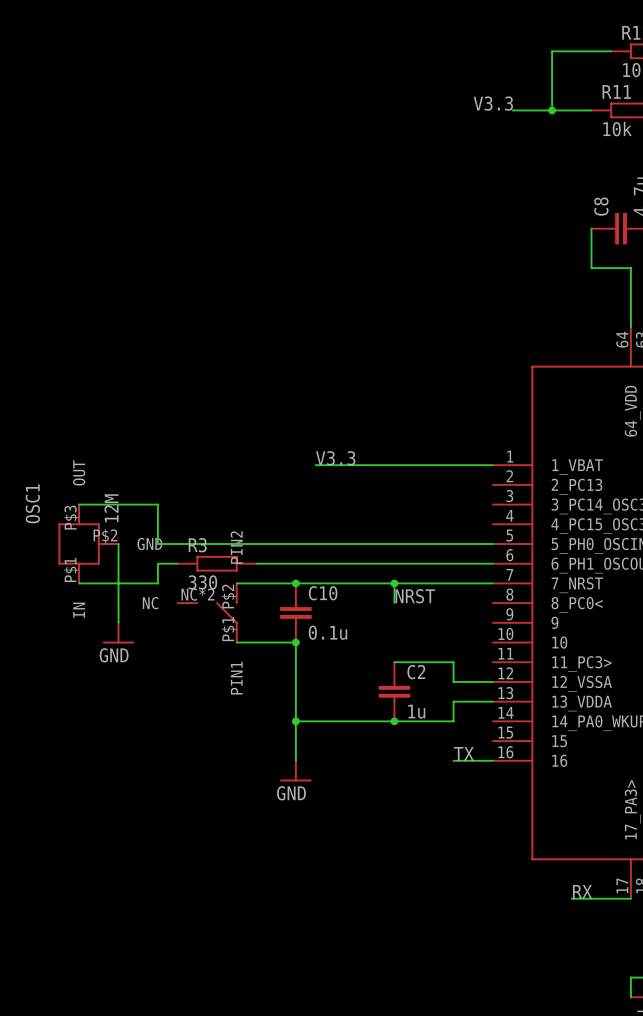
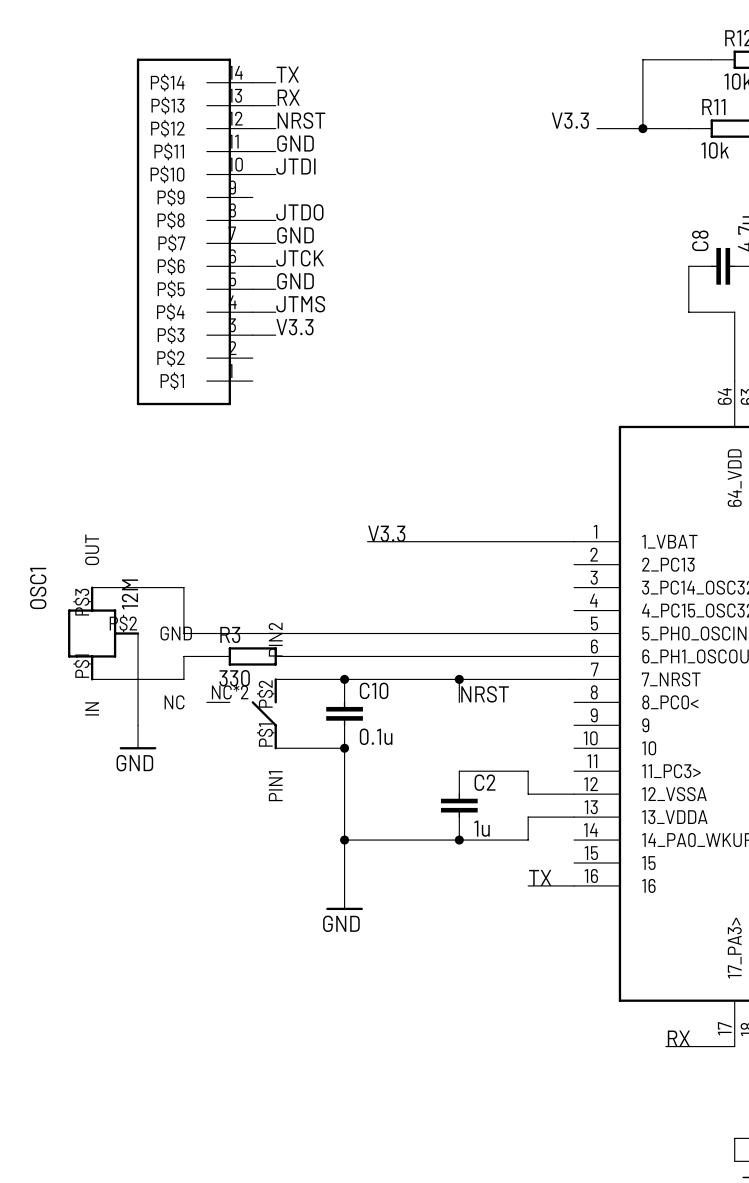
label: none -> TX (287, 74)
wire: none -> (252, 82) (275, 82)
label: none -> RX (288, 97)
wire: none -> (252, 105) (275, 105)
label: none -> NRST (301, 120)
wire: none -> (252, 128) (275, 128)
label: none -> GND (295, 143)
wire: none -> (252, 151) (275, 151)
label: none -> JTDI (295, 166)
wire: none -> (252, 174) (275, 174)
label: none -> JTDO (299, 212)
wire: none -> (252, 220) (275, 220)
part: none -> (194, 231)
label: none -> GND (295, 235)
wire: none -> (252, 243) (275, 243)
label: none -> JTCK (300, 258)
wire: none -> (252, 266) (275, 266)
label: none -> GND (295, 281)
wire: none -> (252, 289) (275, 289)
label: none -> JTMS (300, 304)
wire: none -> (252, 312) (275, 312)
label: none -> V3.3 (295, 327)
wire: none -> (252, 335) (275, 335)

